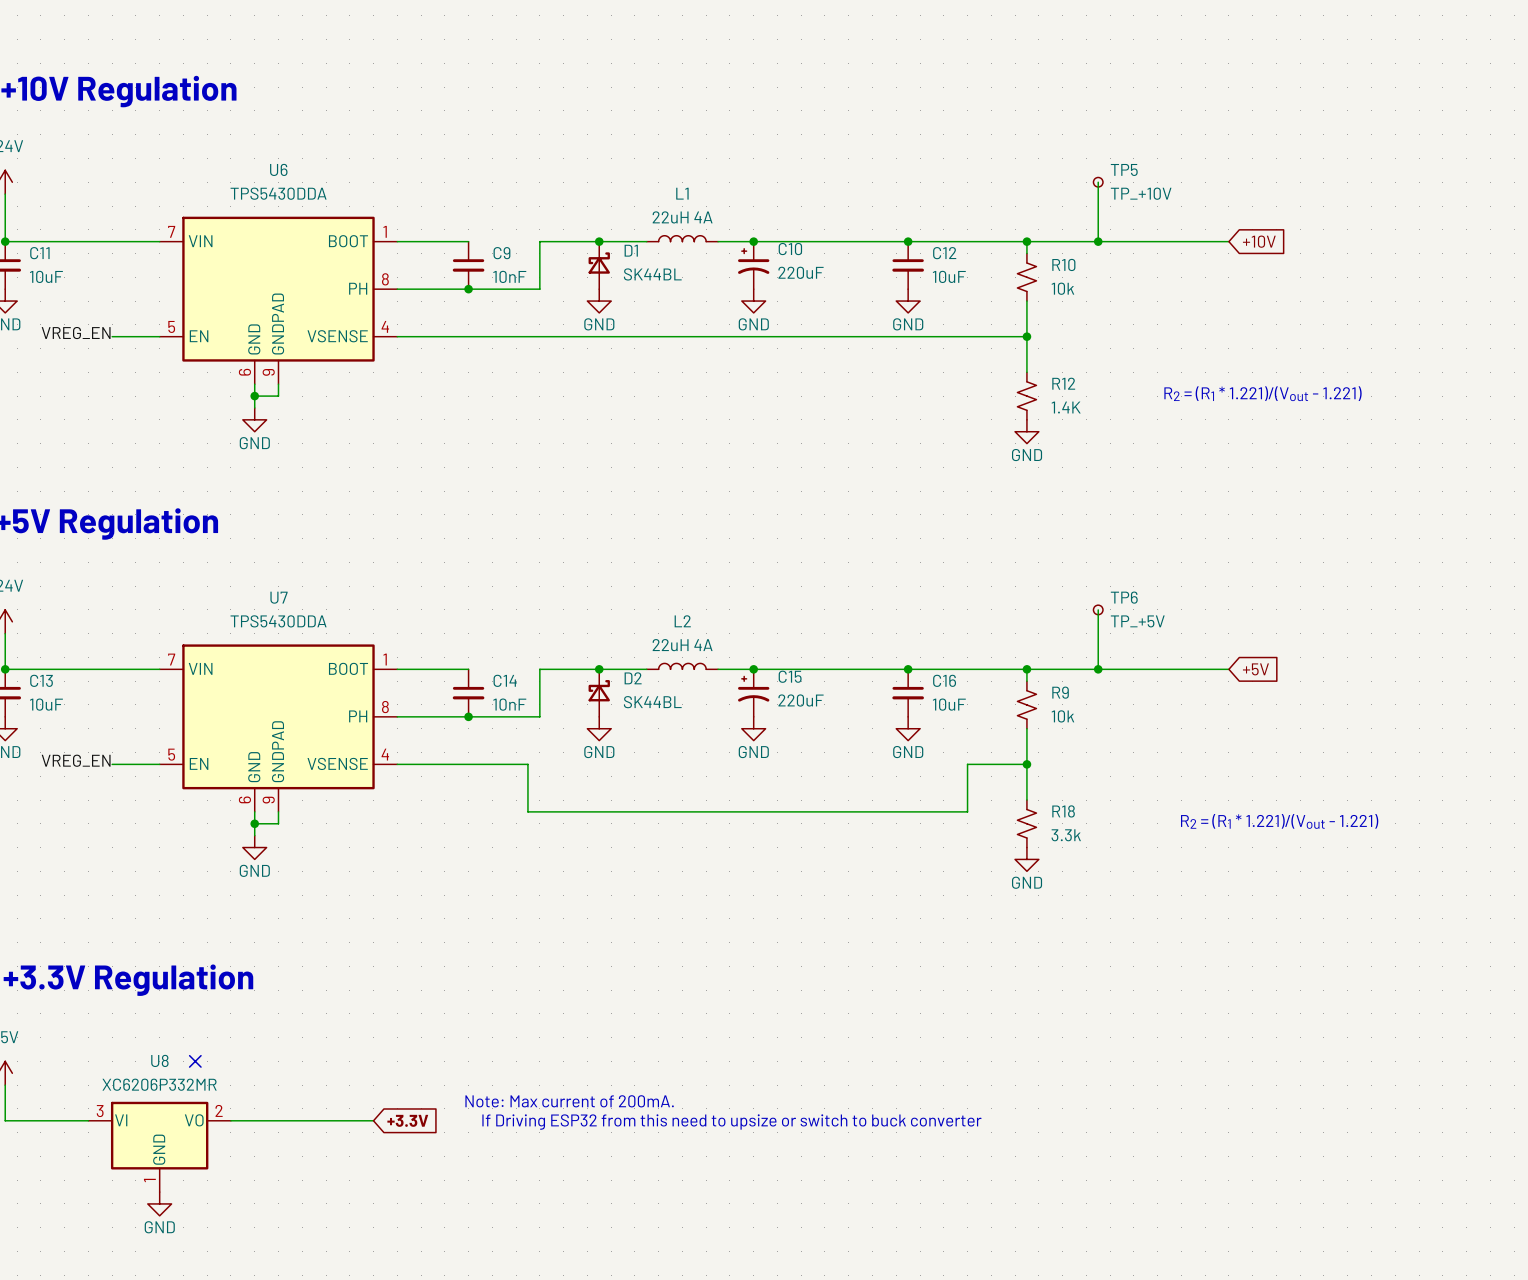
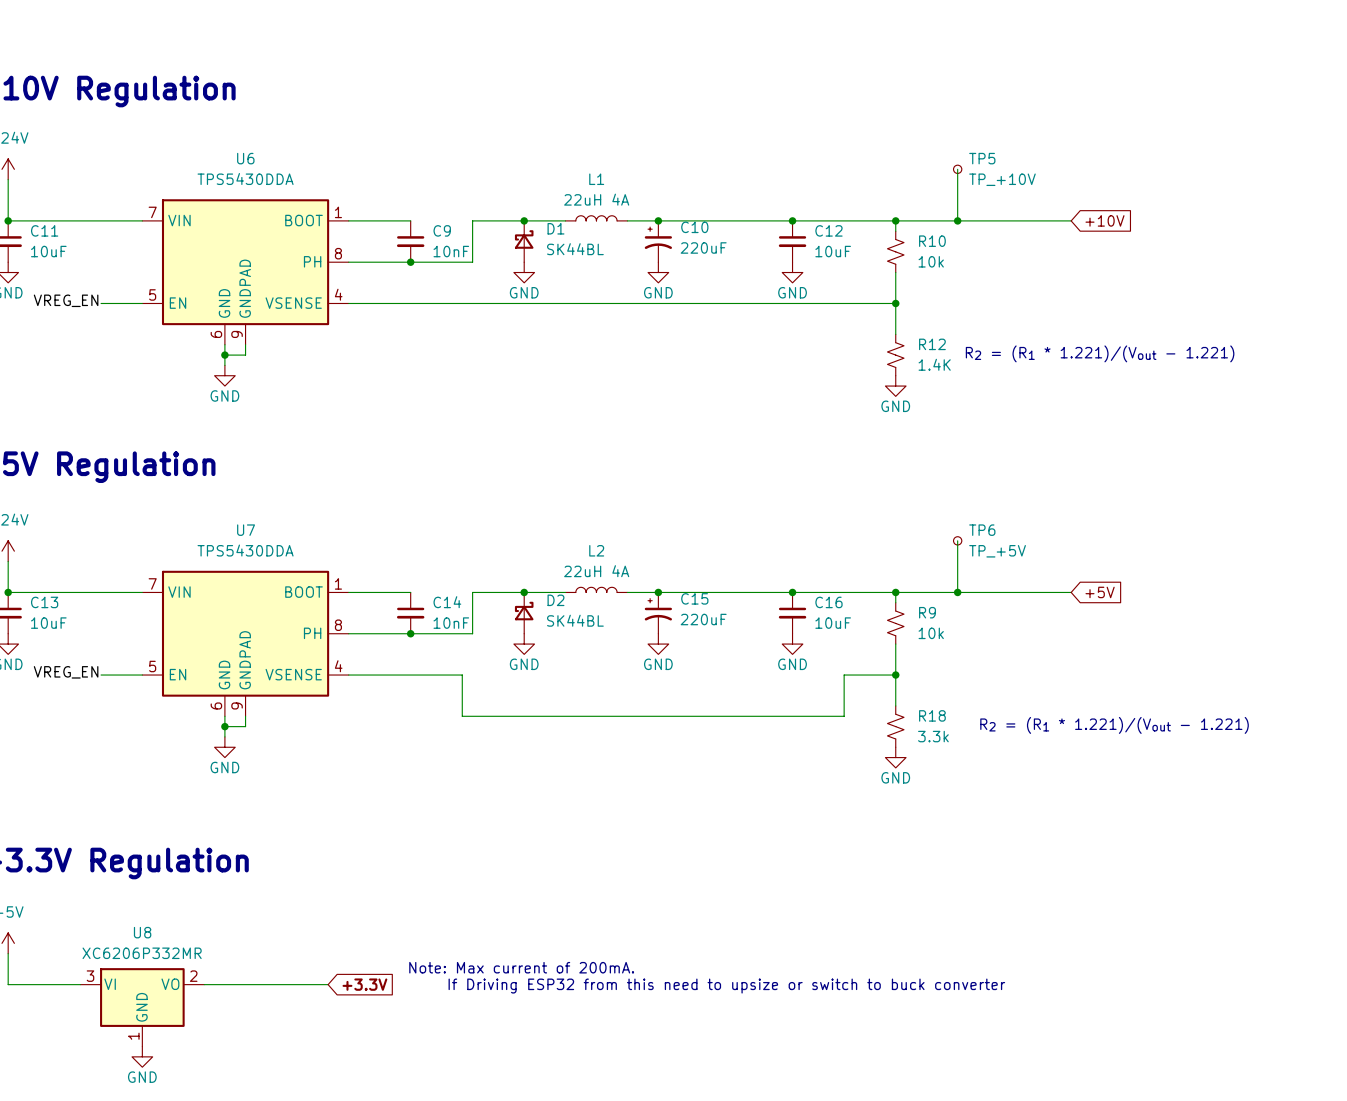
no-connect mark: (195, 1061) -> none

